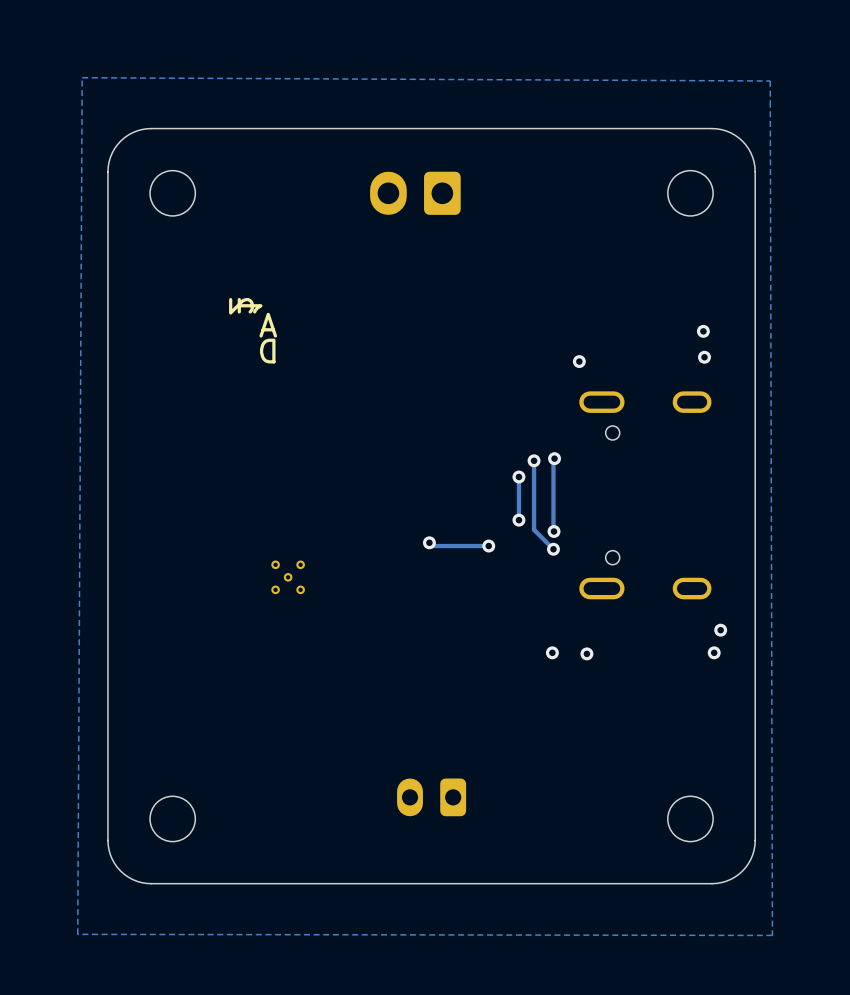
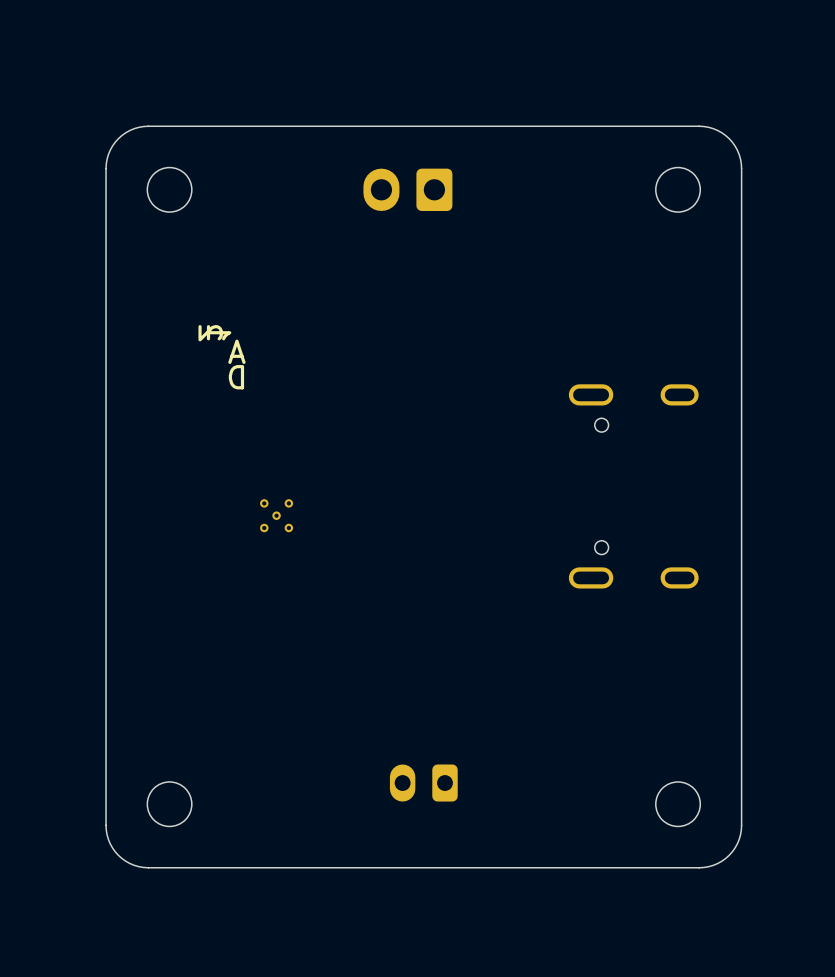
zone outline: (82, 77) (77, 934) (772, 935) (770, 81) (82, 77) -> none
part position: (253, 330) -> (222, 357)
via: (703, 331) -> none
via: (704, 357) -> none
via: (579, 361) -> none
track: (554, 458) (553, 531) -> none
via: (554, 458) -> none
track: (534, 460) (534, 529) (553, 549) -> none
via: (534, 460) -> none
track: (518, 476) (518, 520) -> none
via: (518, 476) -> none
via: (518, 520) -> none
via: (553, 531) -> none
track: (429, 542) (432, 546) (488, 546) -> none
via: (429, 542) -> none
via: (488, 546) -> none
via: (553, 549) -> none
part position: (288, 577) -> (276, 515)
via: (720, 630) -> none
via: (552, 652) -> none
via: (714, 652) -> none
via: (586, 653) -> none

